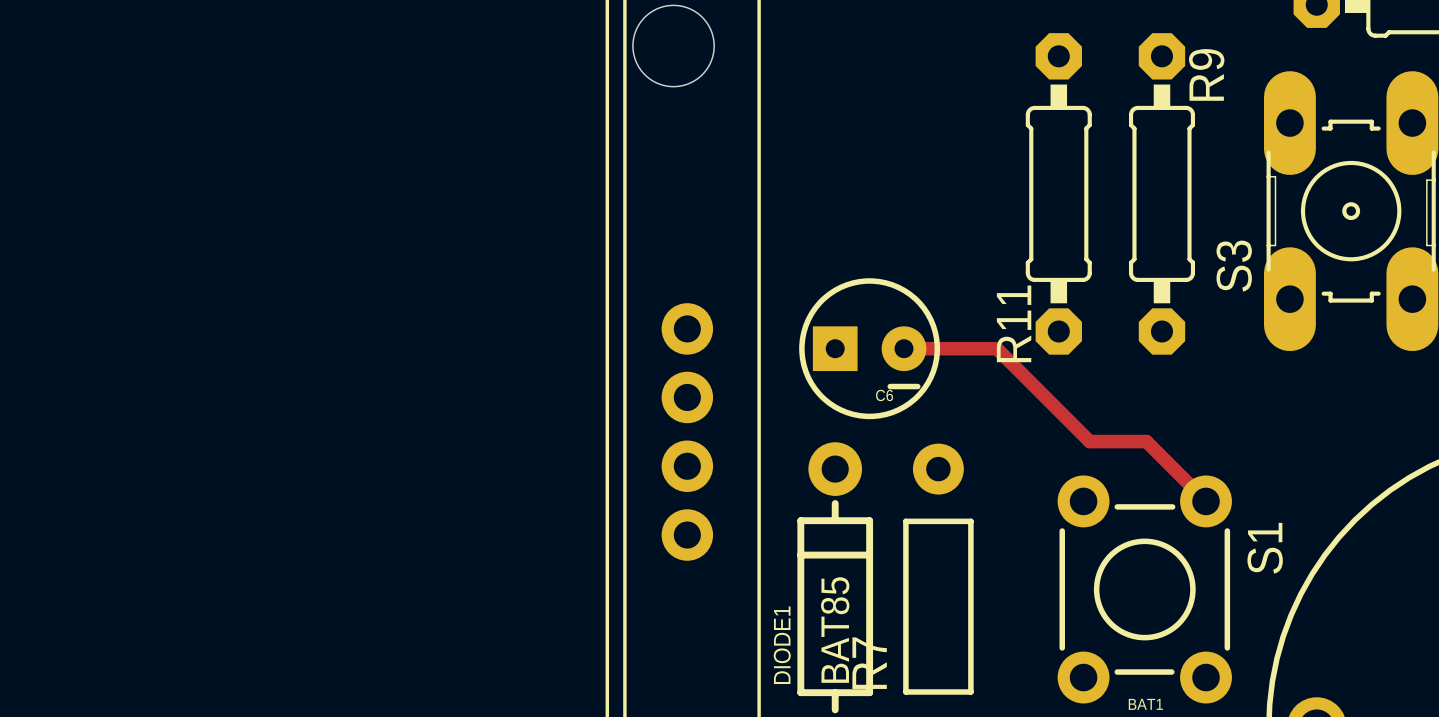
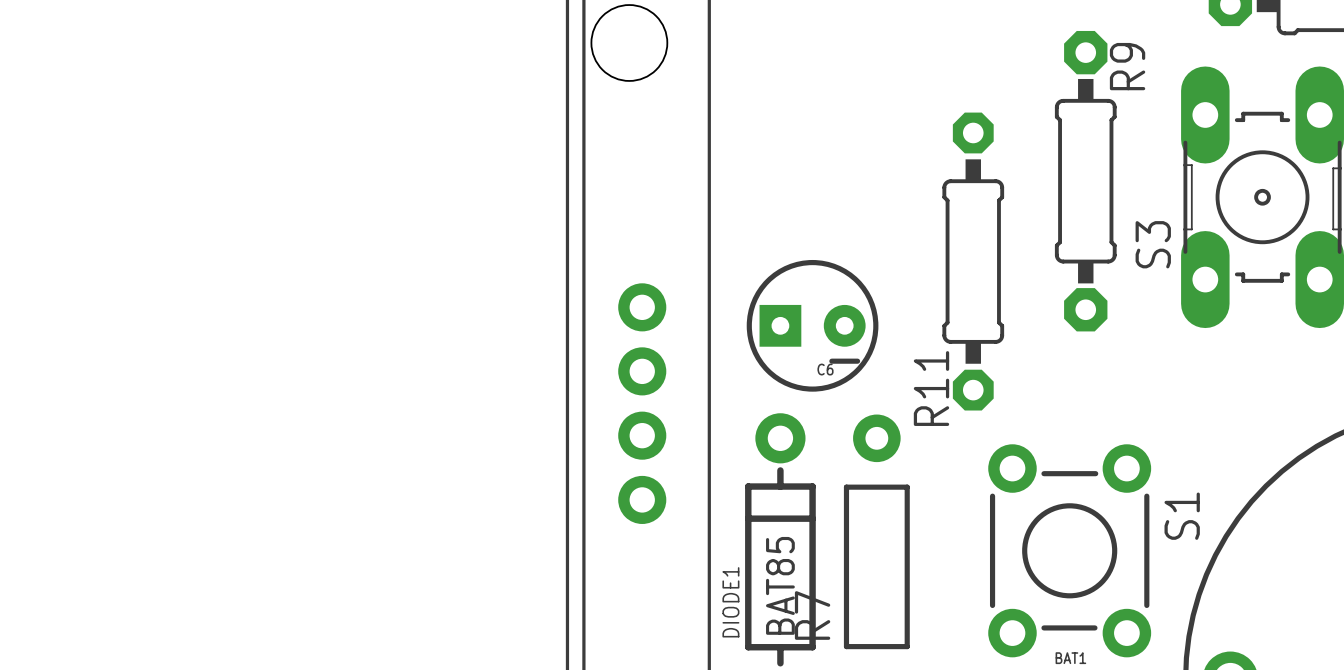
R11 footprint: [1025, 33, 1092, 355] -> [942, 112, 1005, 411]
track: (904, 348) (996, 348) (1089, 441) (1146, 441) (1206, 501) -> none

